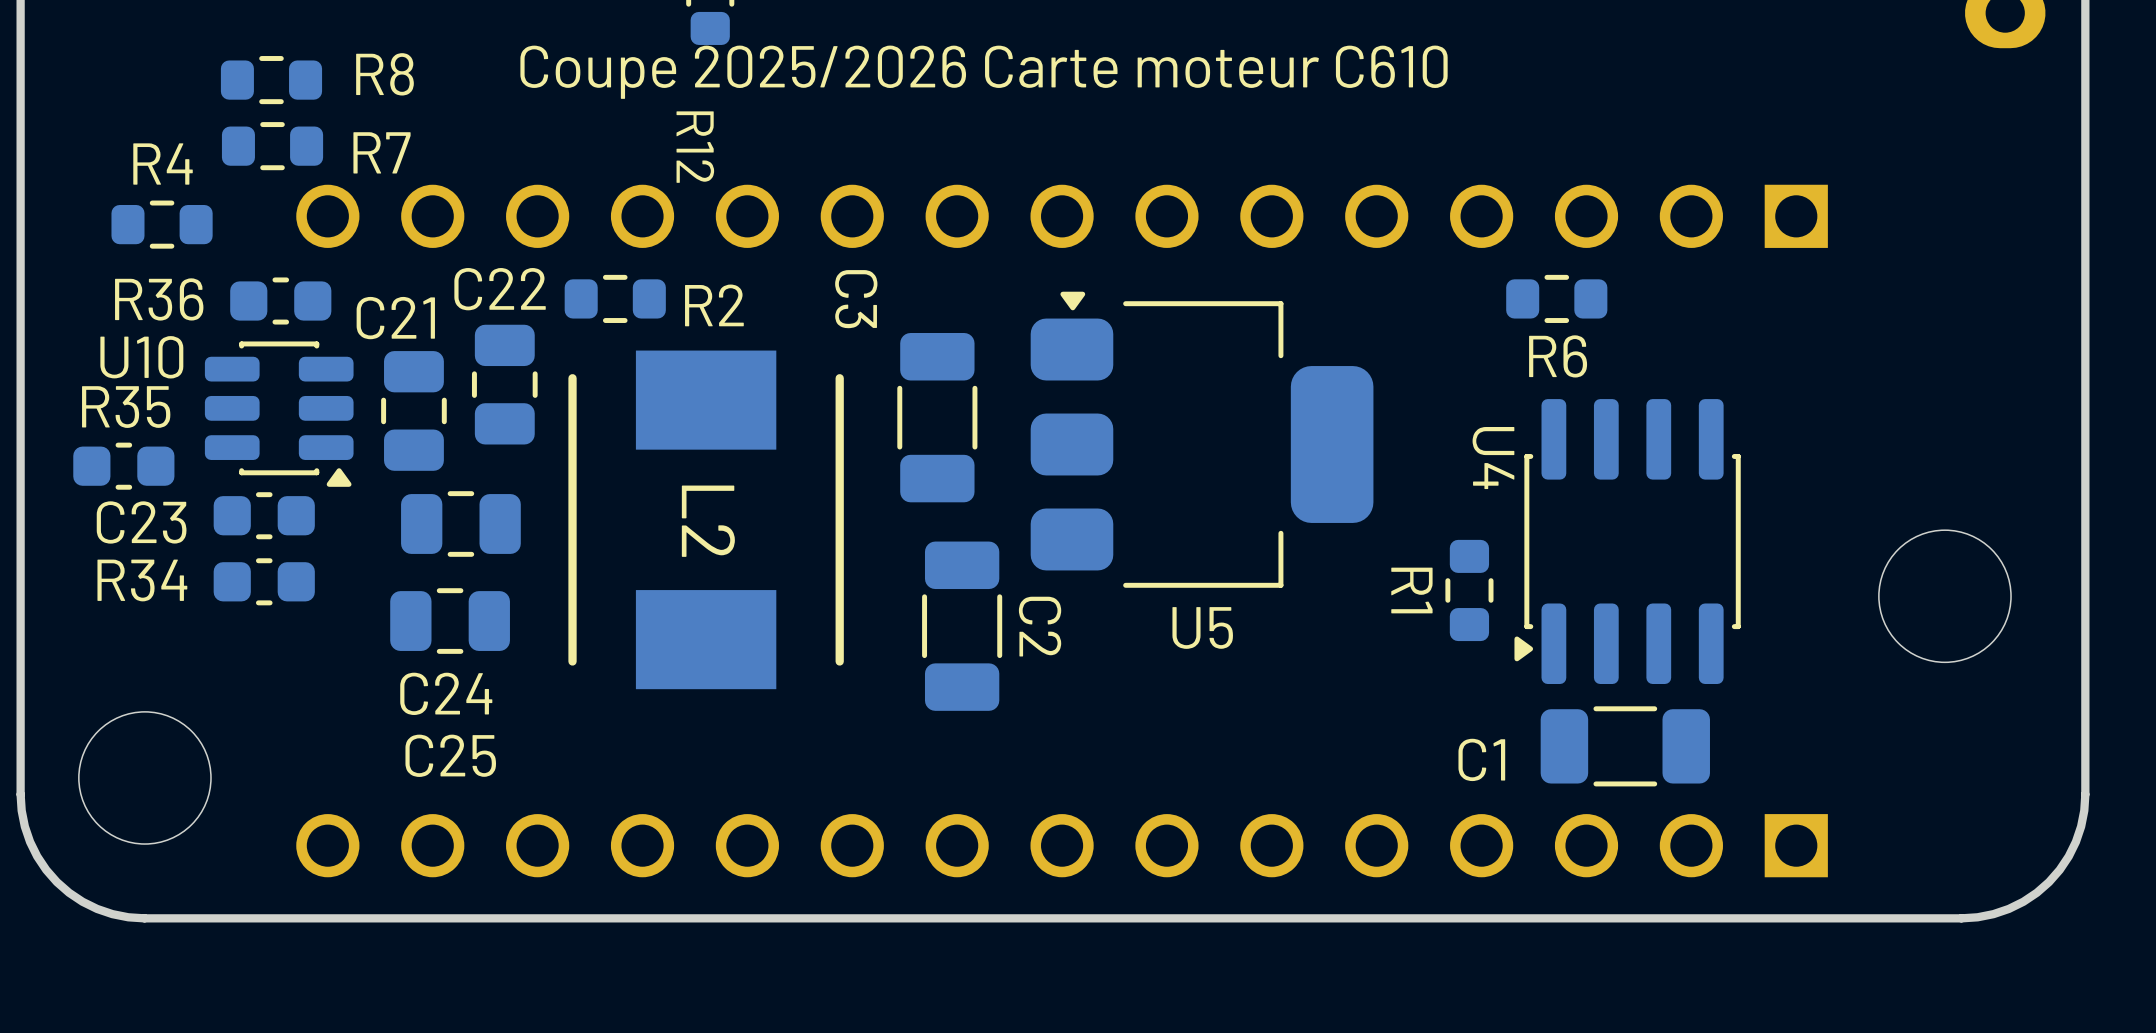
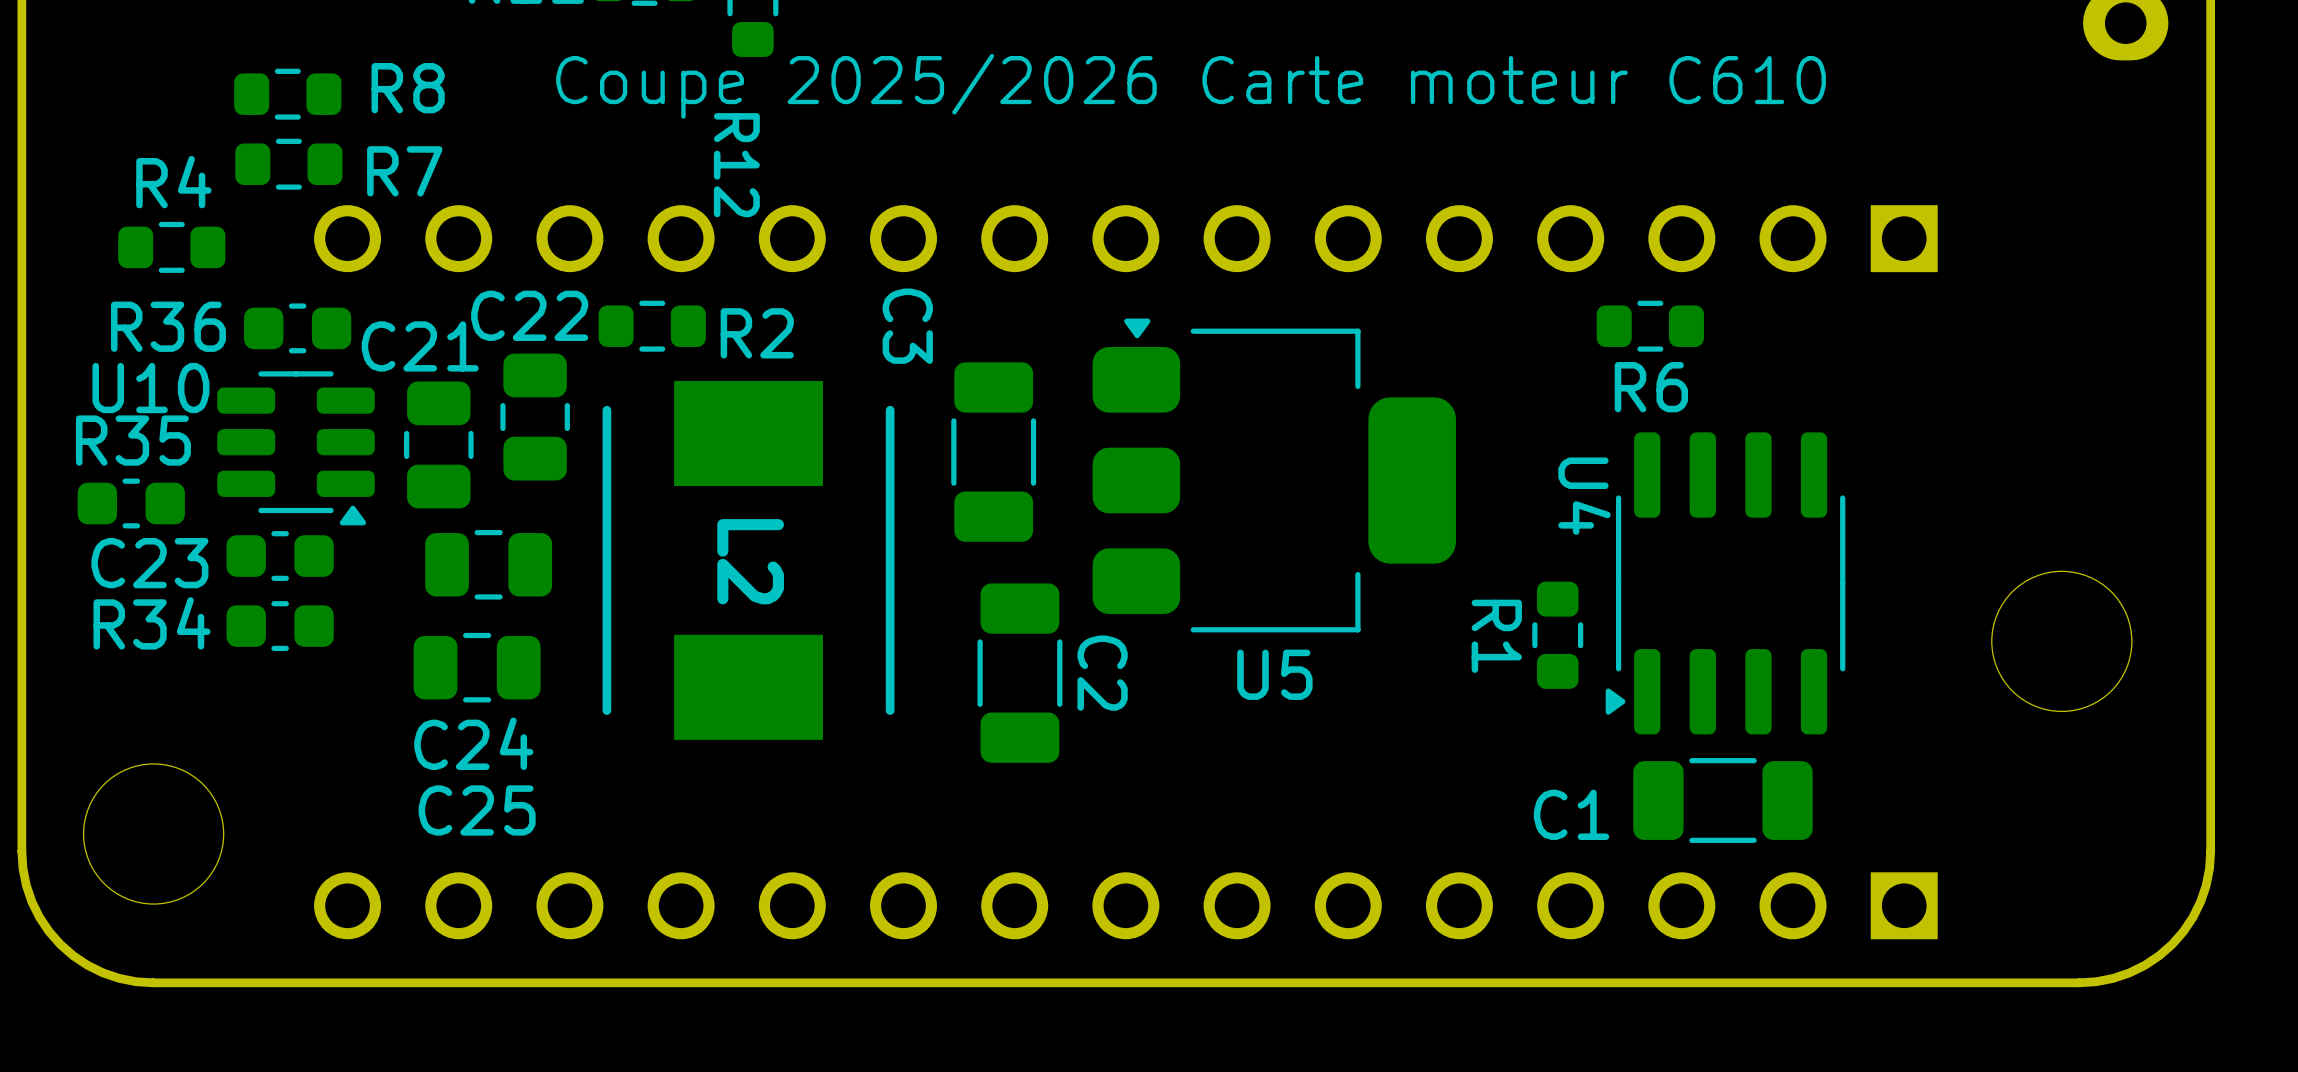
U10 footprint: [204, 341, 354, 487] -> [217, 371, 375, 526]
U4 footprint: [1514, 399, 1741, 685] -> [1605, 432, 1846, 735]

